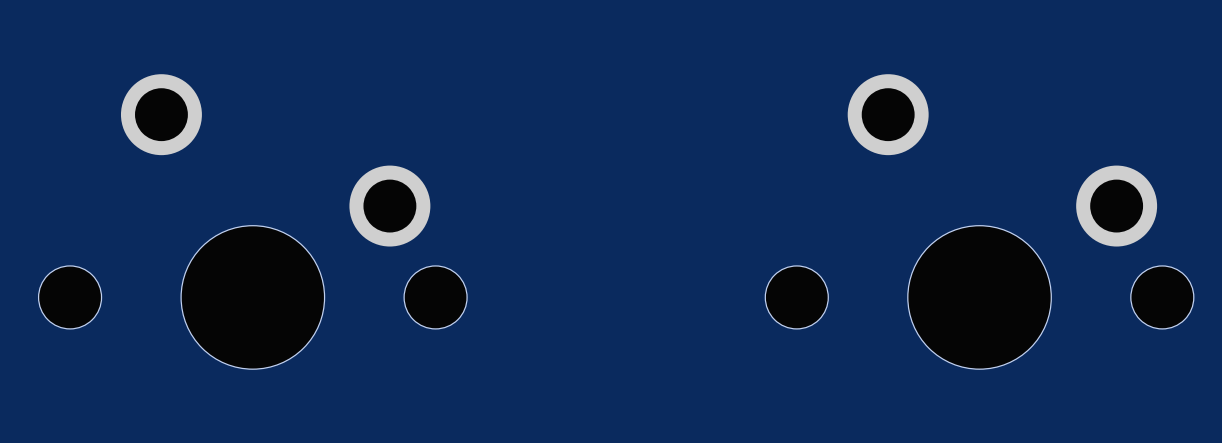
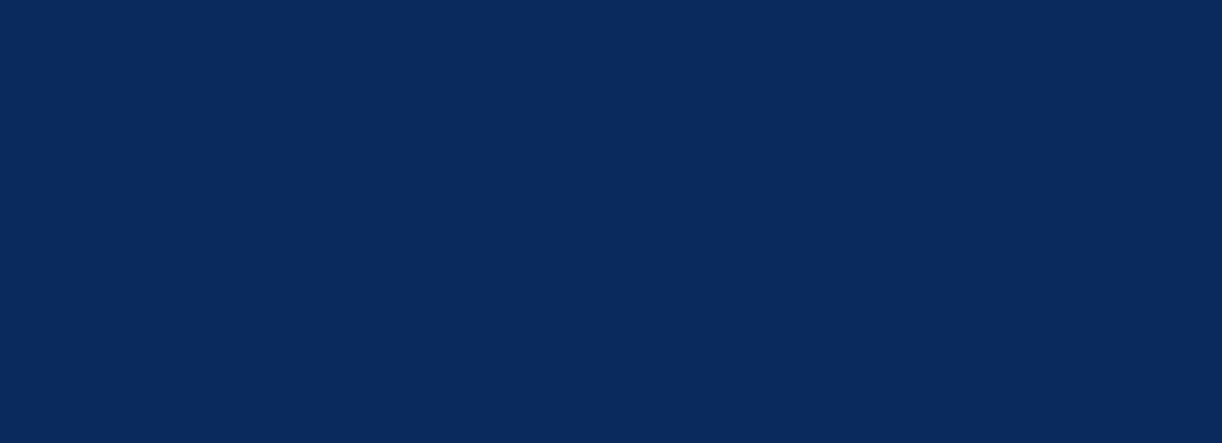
part: (252, 221) -> none
part: (979, 221) -> none

